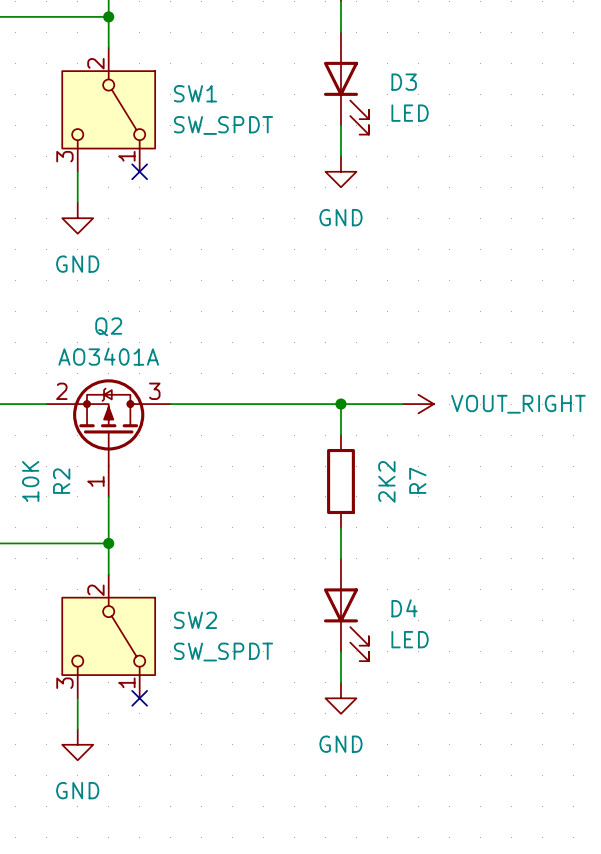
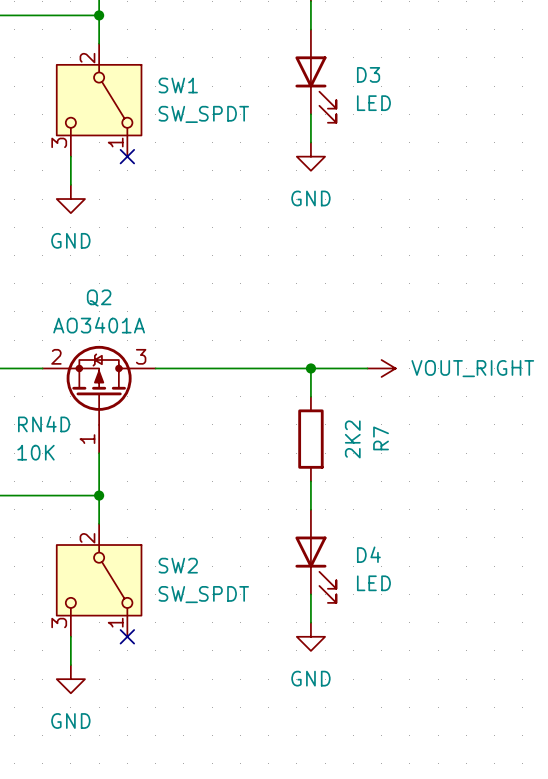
R2 value rotation: 0° (30, 481) -> 90° clockwise (36, 452)
R2 name: R2 (61, 481) -> RN4D (44, 424)

